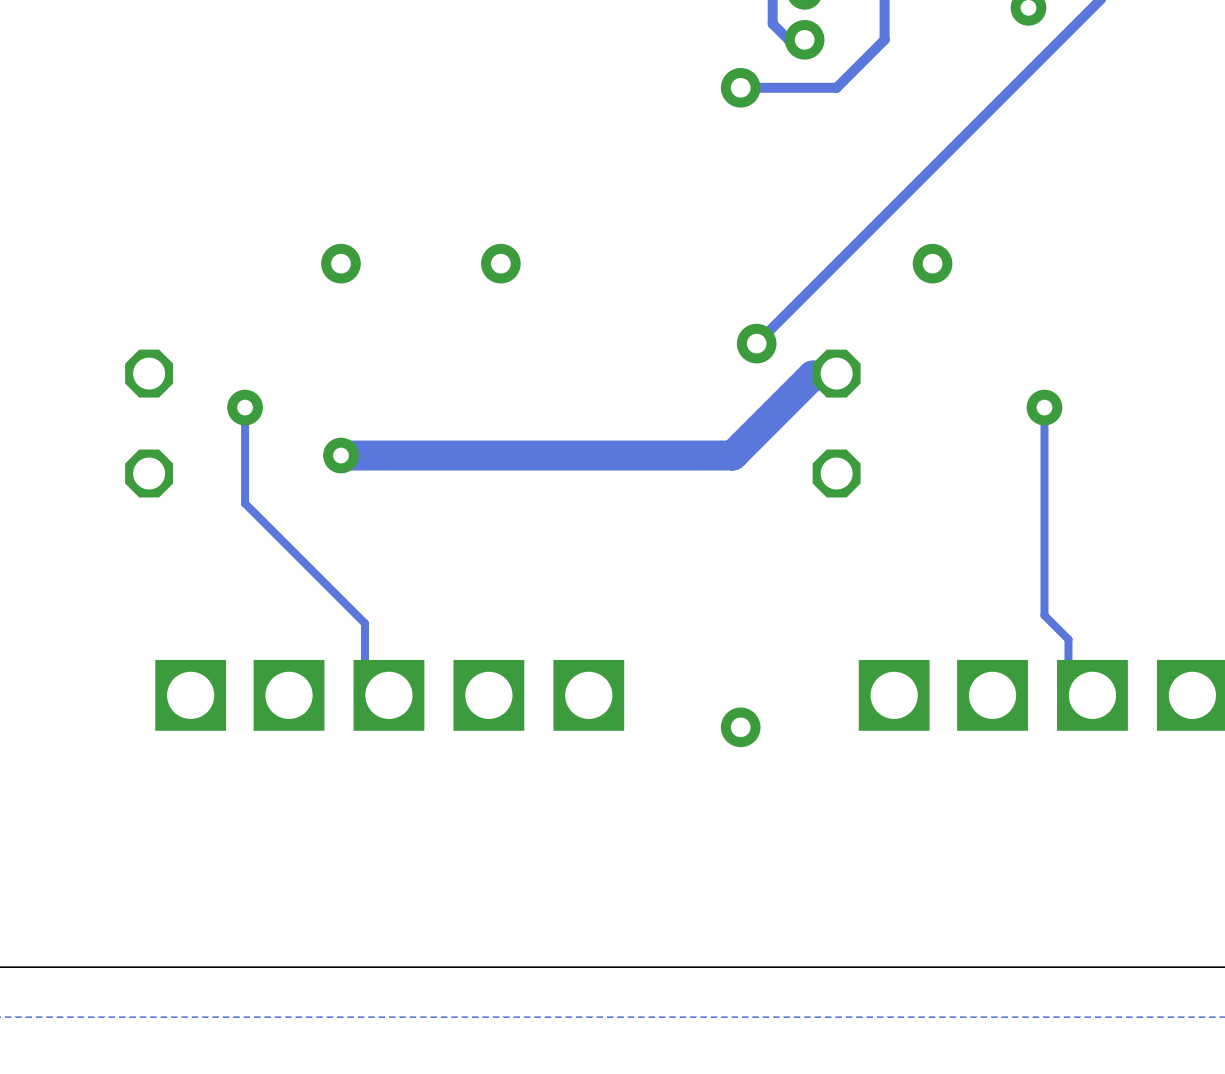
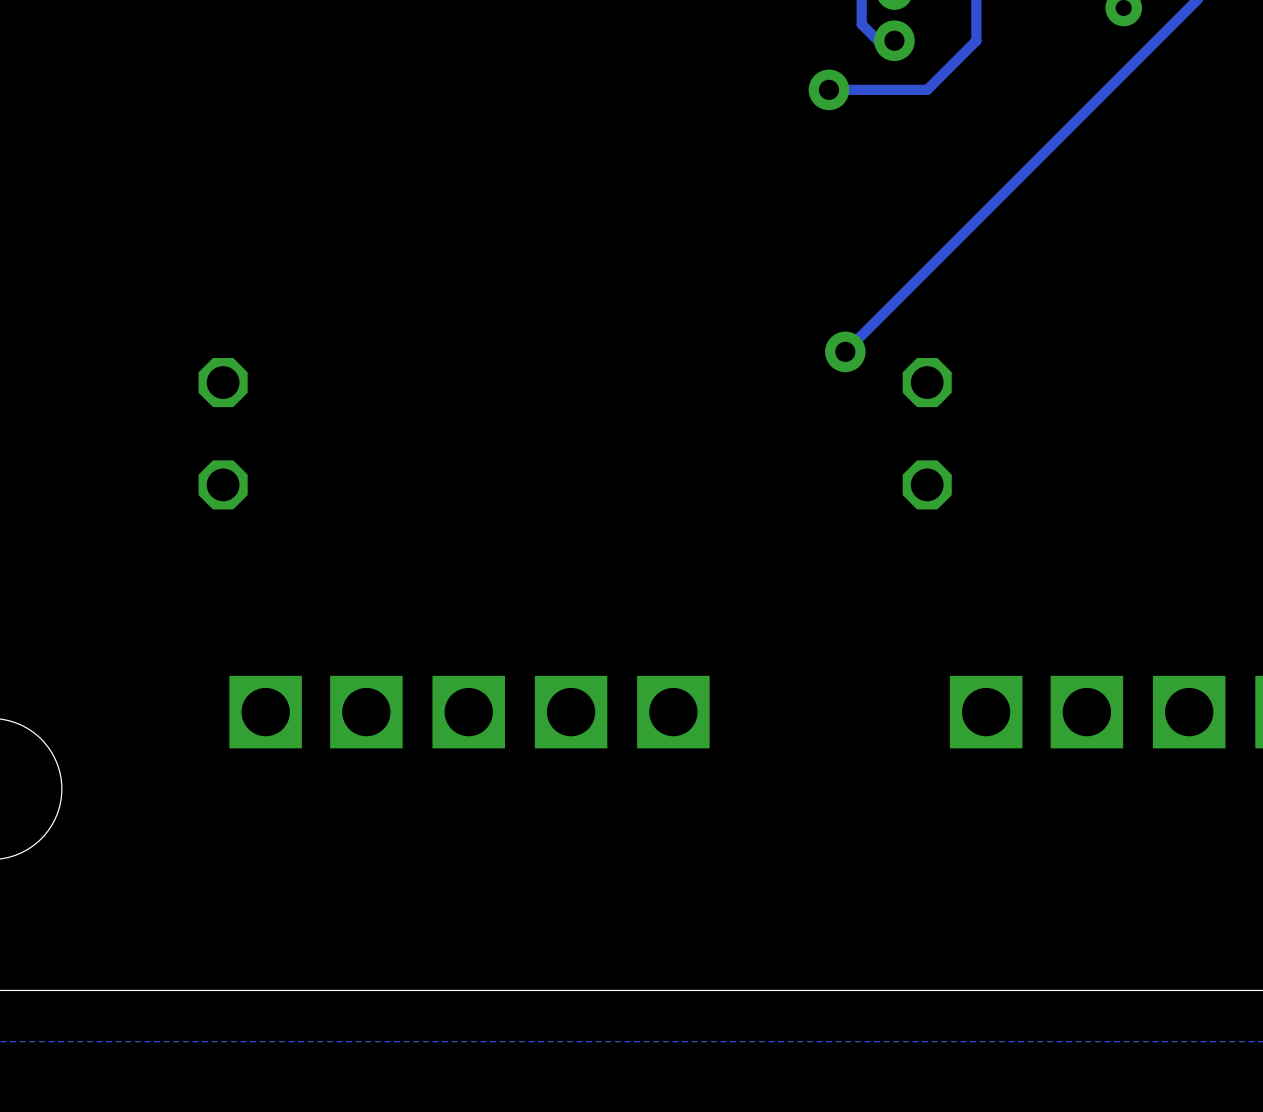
via: (340, 263) -> none
via: (500, 263) -> none
via: (932, 263) -> none
track: (836, 373) (836, 375) (812, 375) (732, 455) (340, 455) -> none
track: (245, 407) (245, 503) (364, 623) (364, 695) (388, 695) -> none
via: (245, 407) -> none
track: (1044, 407) (1044, 615) (1068, 639) (1068, 695) (1092, 695) -> none
via: (1044, 407) -> none
via: (340, 455) -> none
via: (740, 727) -> none

